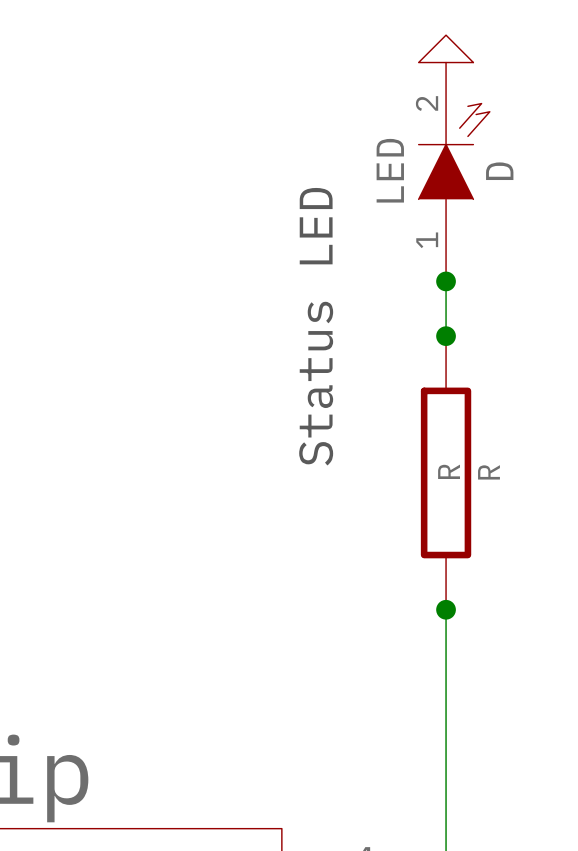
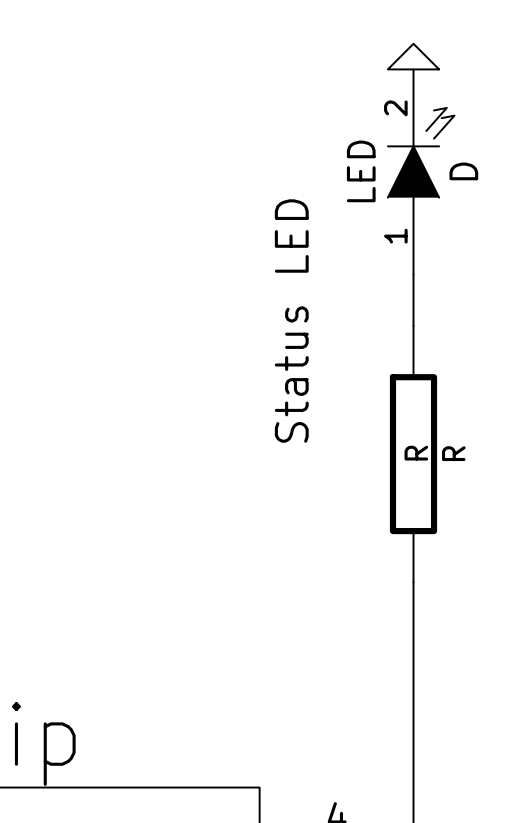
junction: (446, 281) -> none
junction: (446, 336) -> none
junction: (446, 609) -> none

